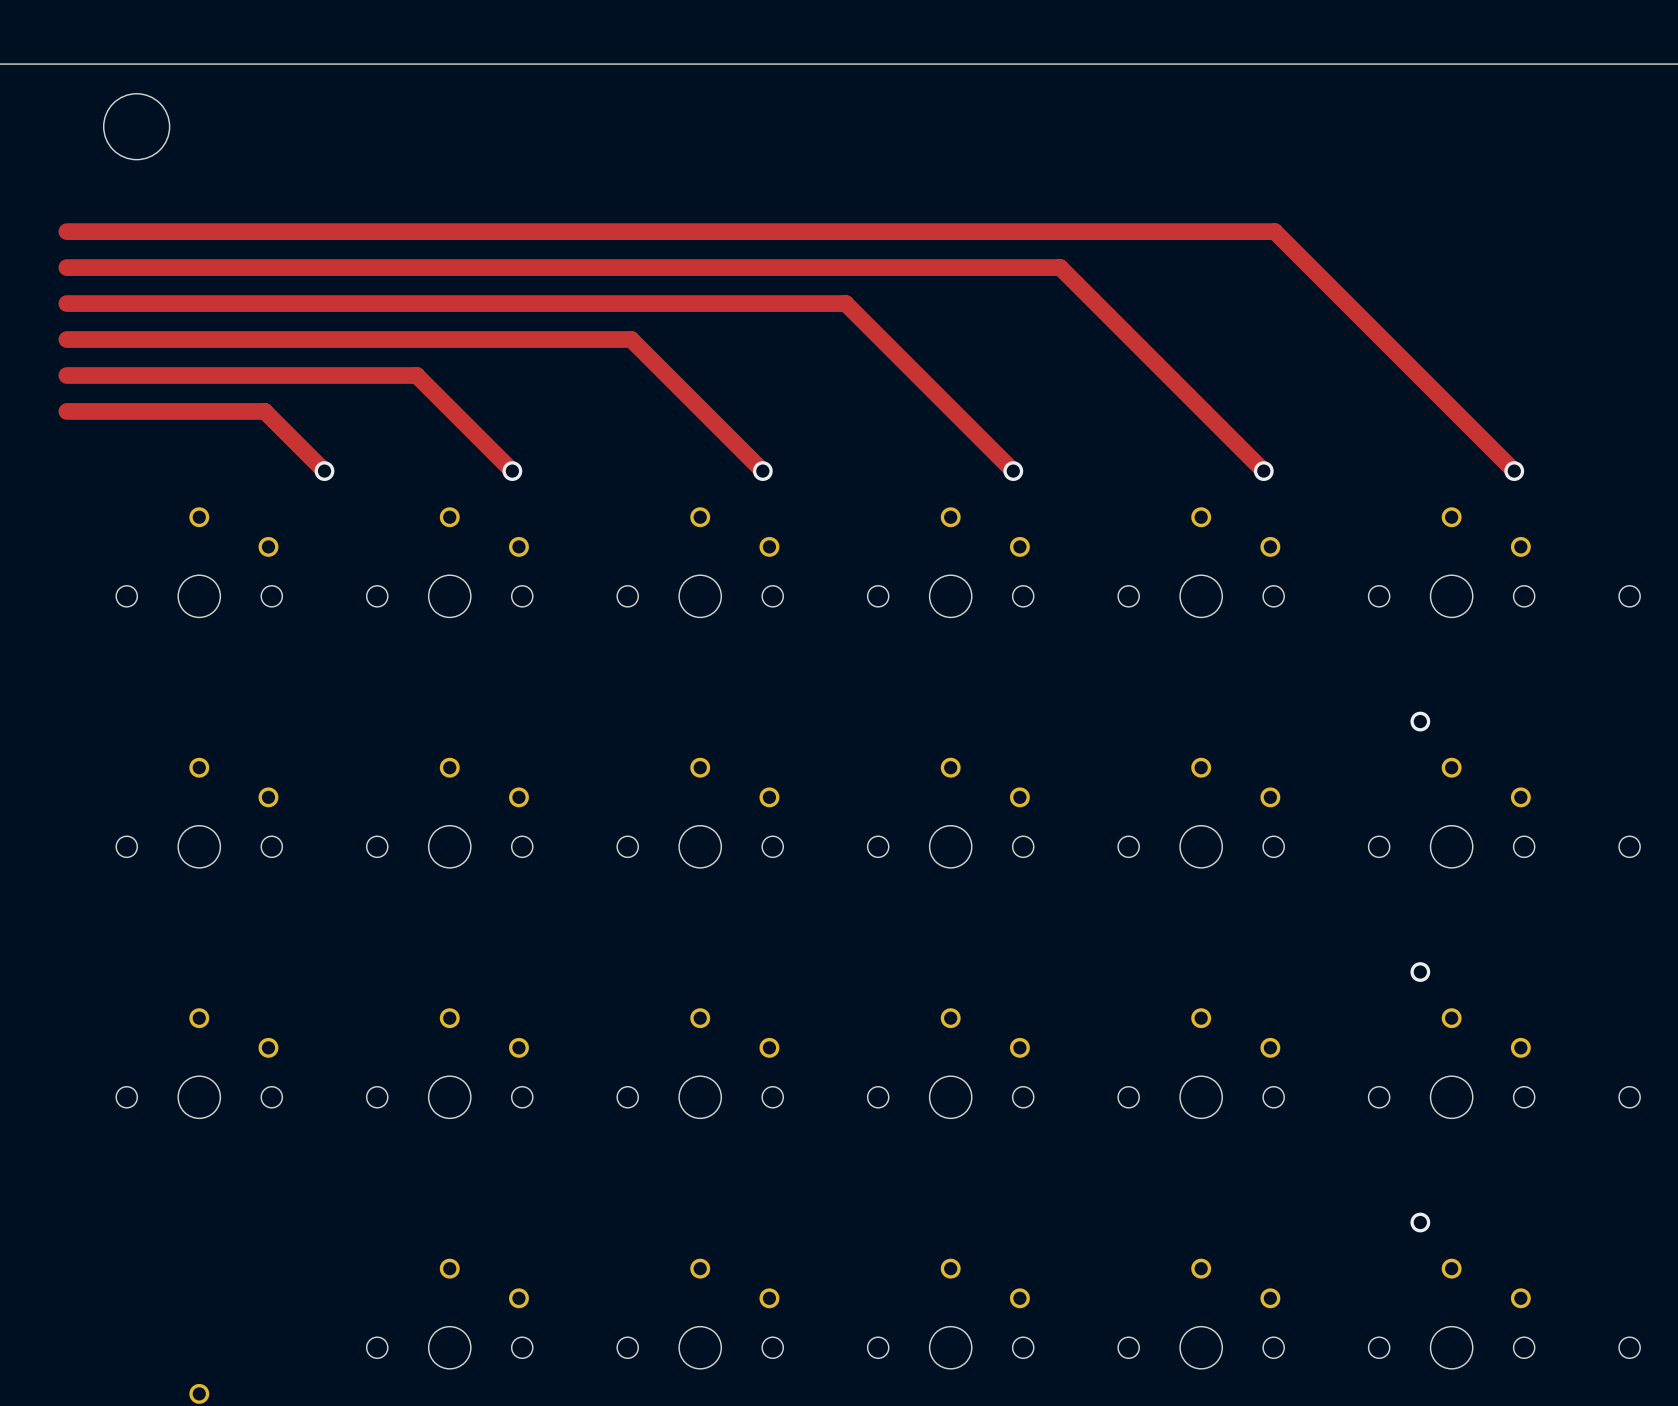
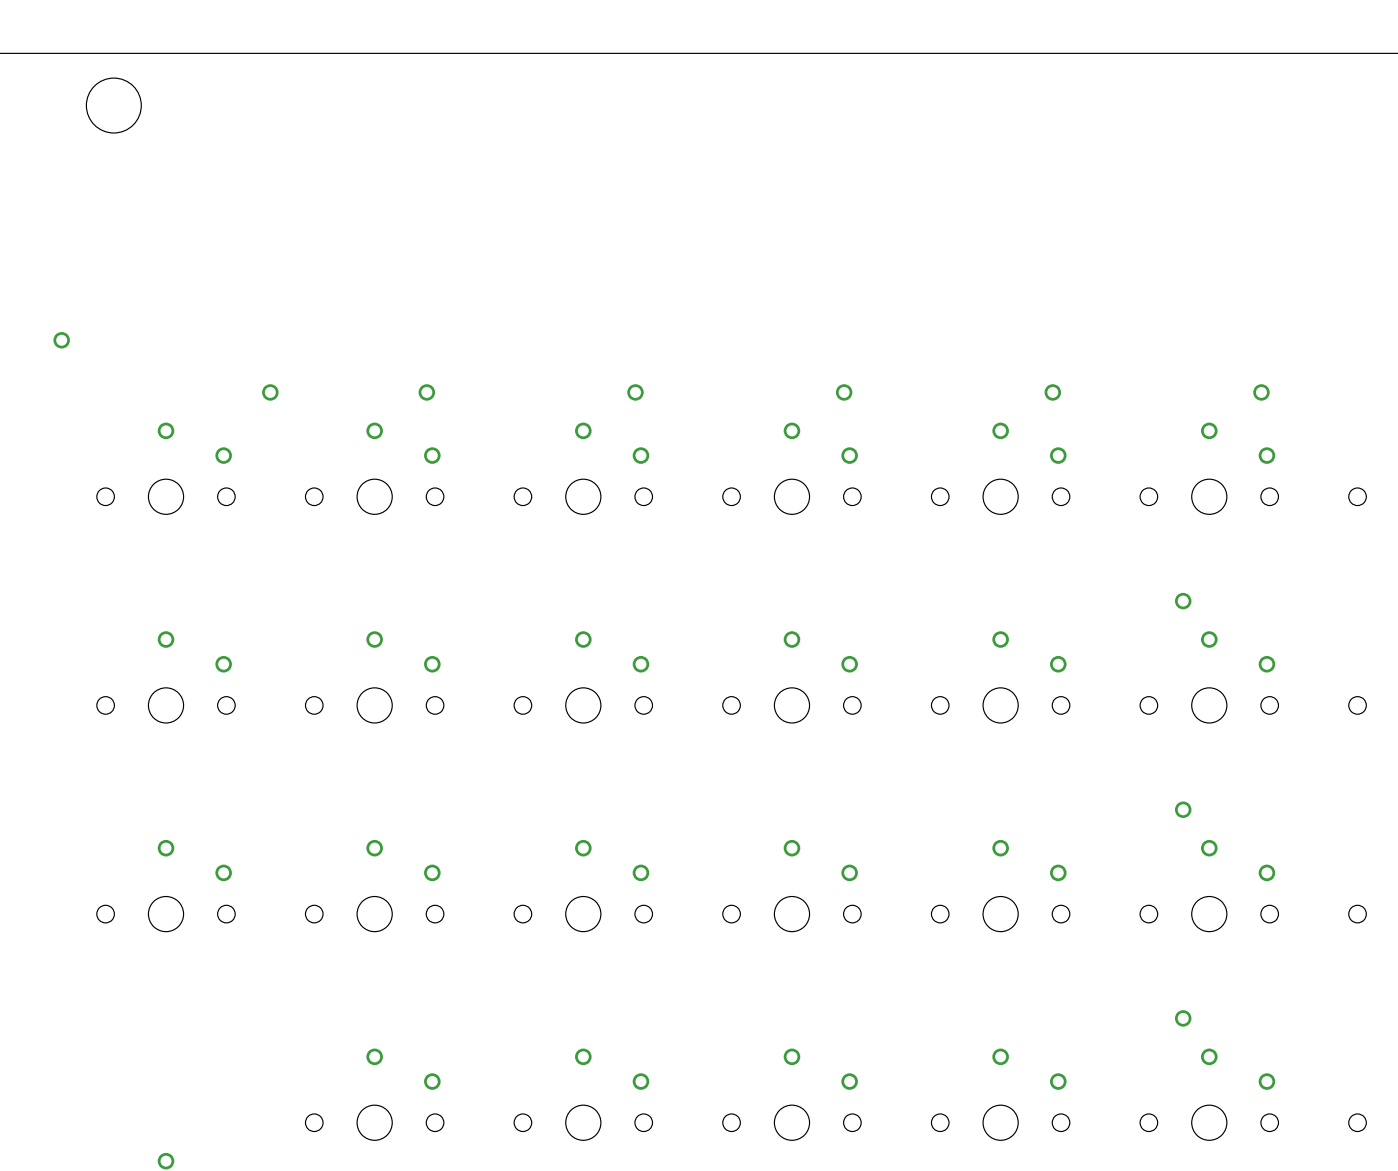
track: (66, 231) (1274, 231) (1514, 471) -> none
track: (66, 267) (1060, 267) (1263, 471) -> none
track: (66, 303) (845, 303) (1013, 471) -> none
track: (66, 339) (631, 339) (762, 471) -> none
track: (66, 375) (416, 375) (512, 471) -> none
via: none -> (61, 340)
track: (66, 411) (264, 411) (324, 471) -> none

